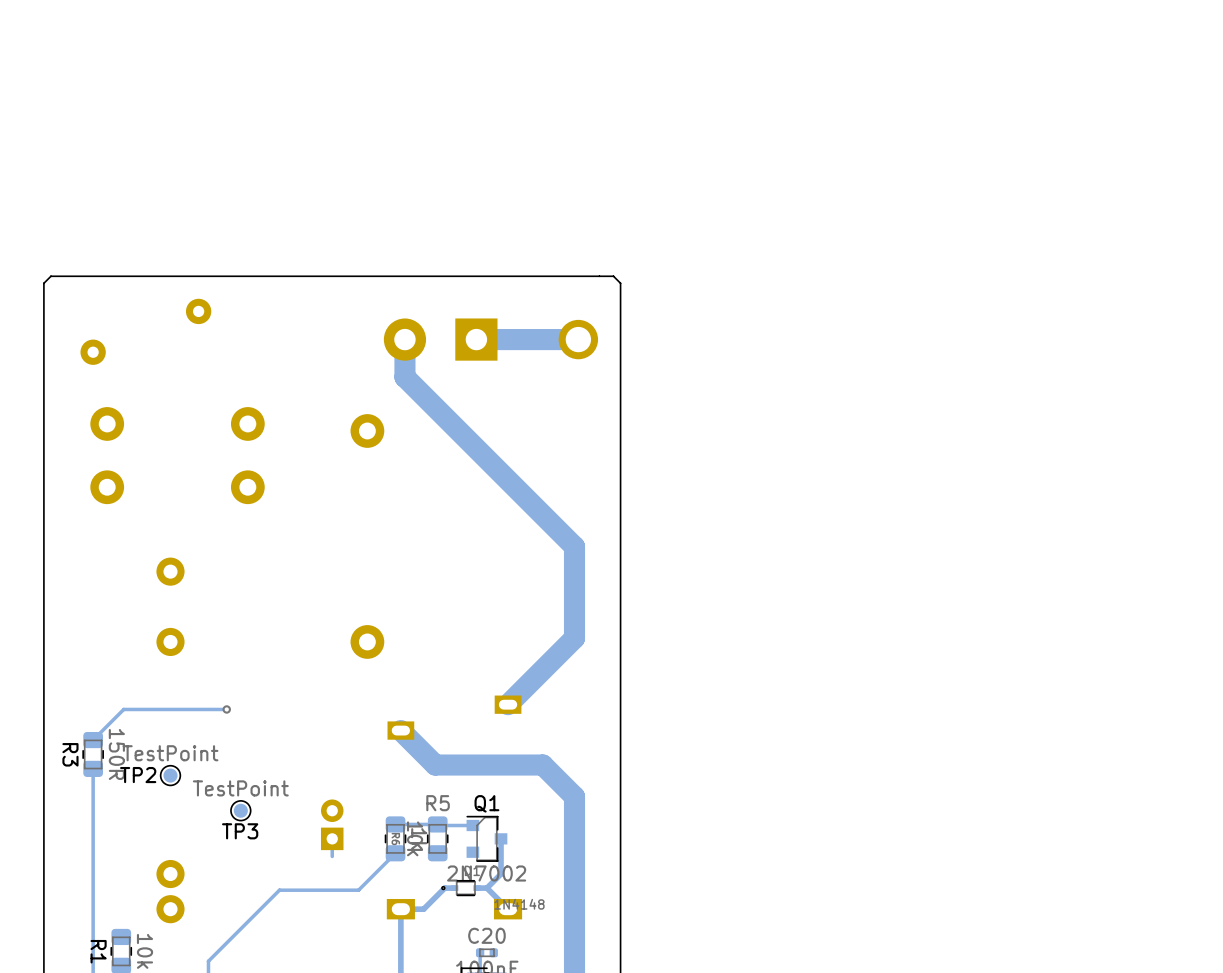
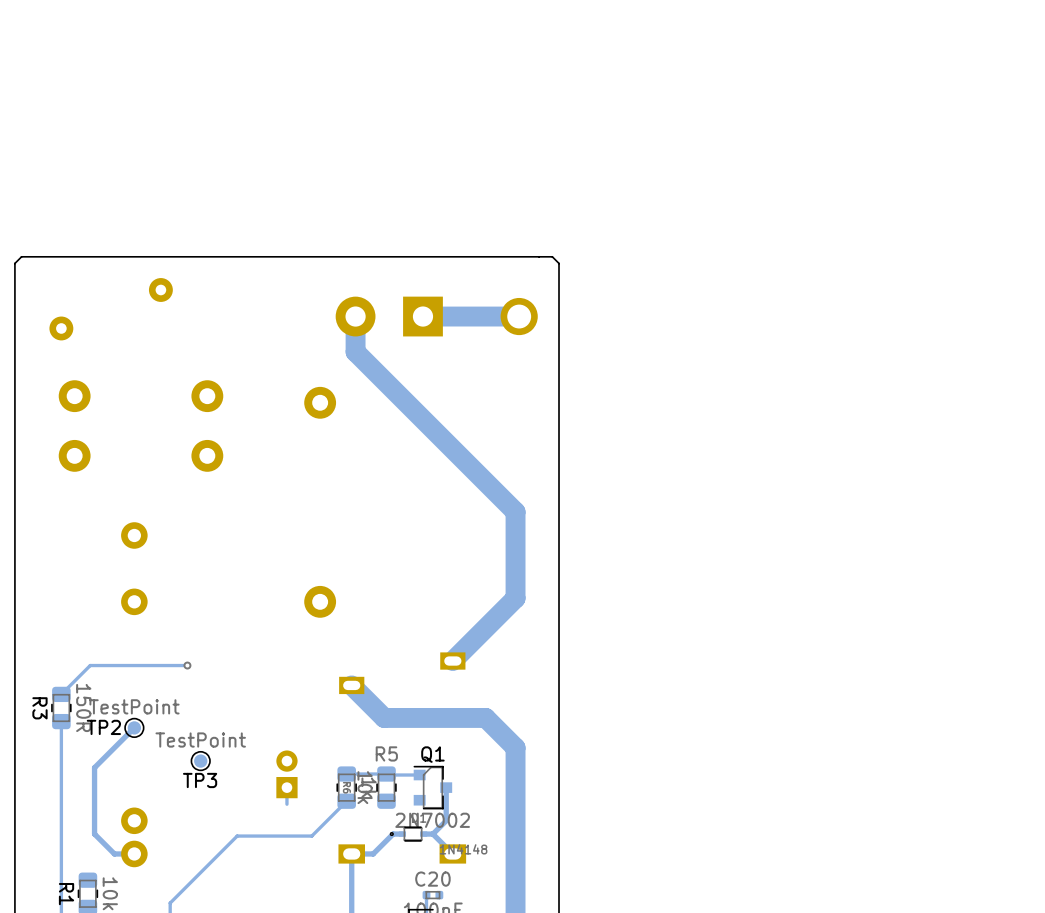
track: none -> (134, 727) (94, 767) (94, 834) (114, 853) (134, 853)

